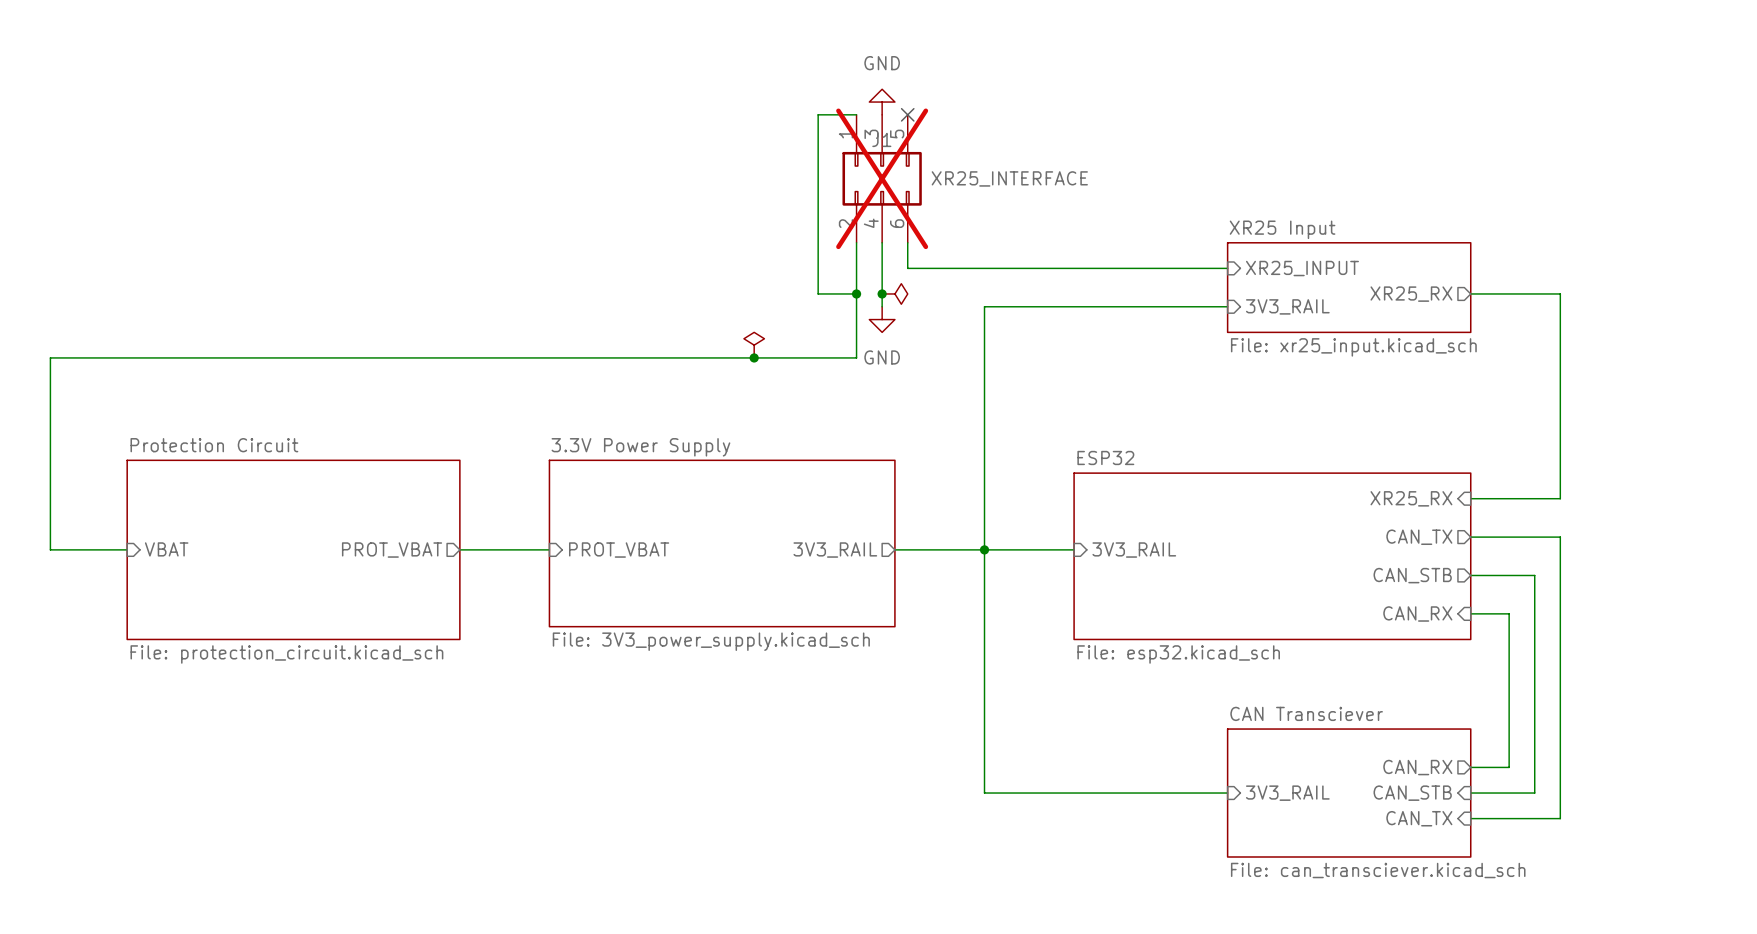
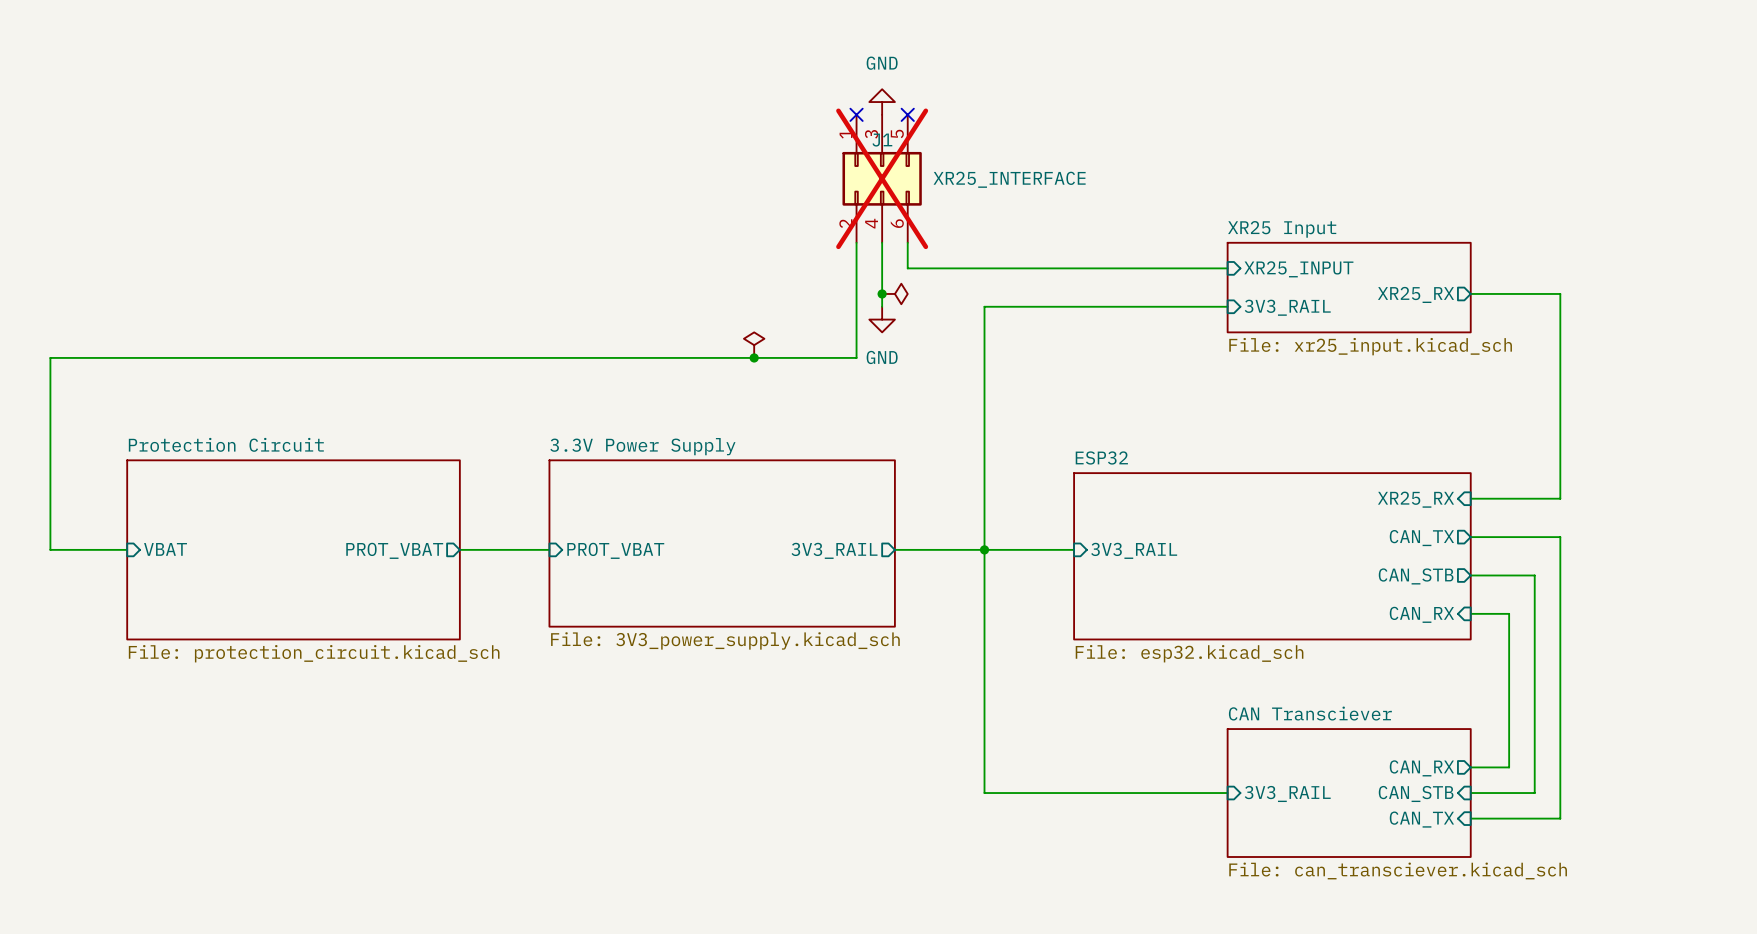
wire: (856, 114) (818, 114) (818, 293) (856, 293) -> none
no-connect mark: none -> (856, 114)
junction: (856, 293) -> none

